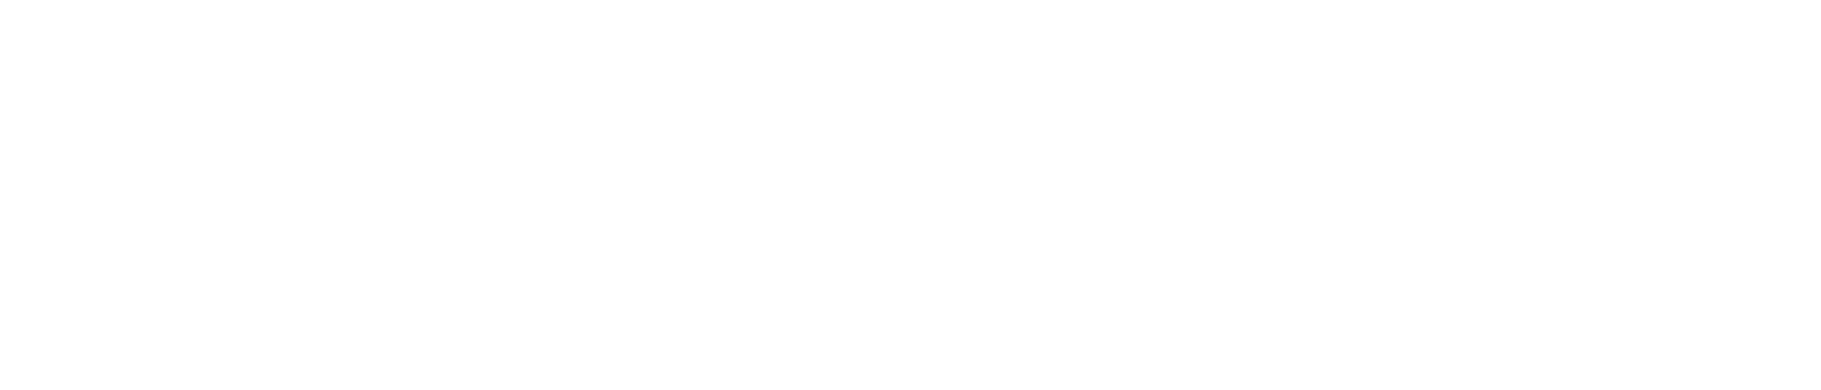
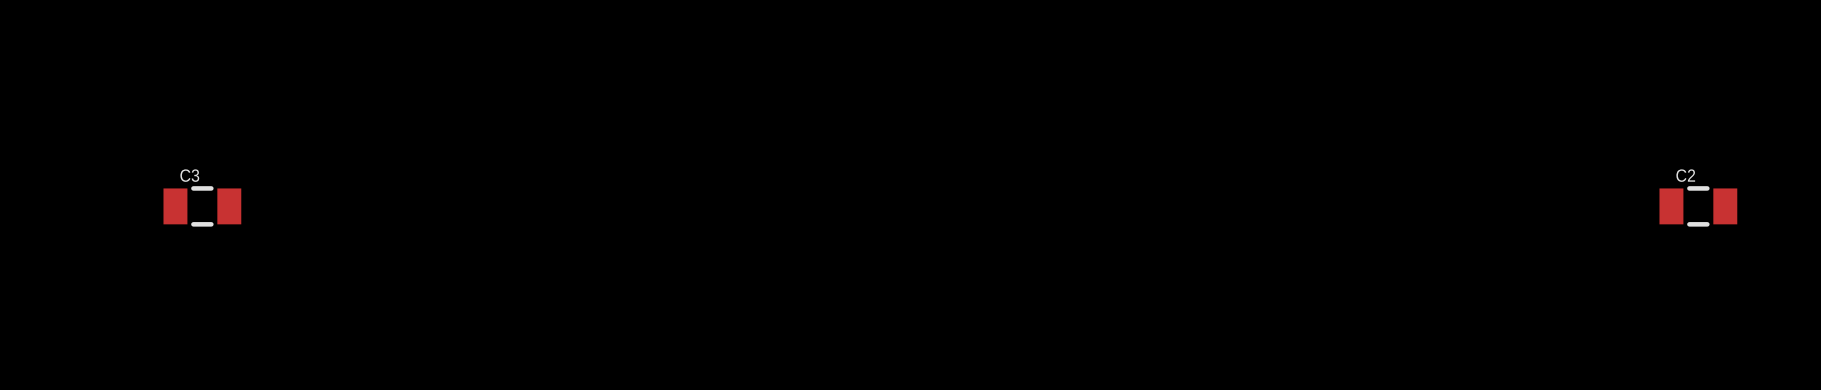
C3: none -> (202, 206)
C2: none -> (1698, 206)

